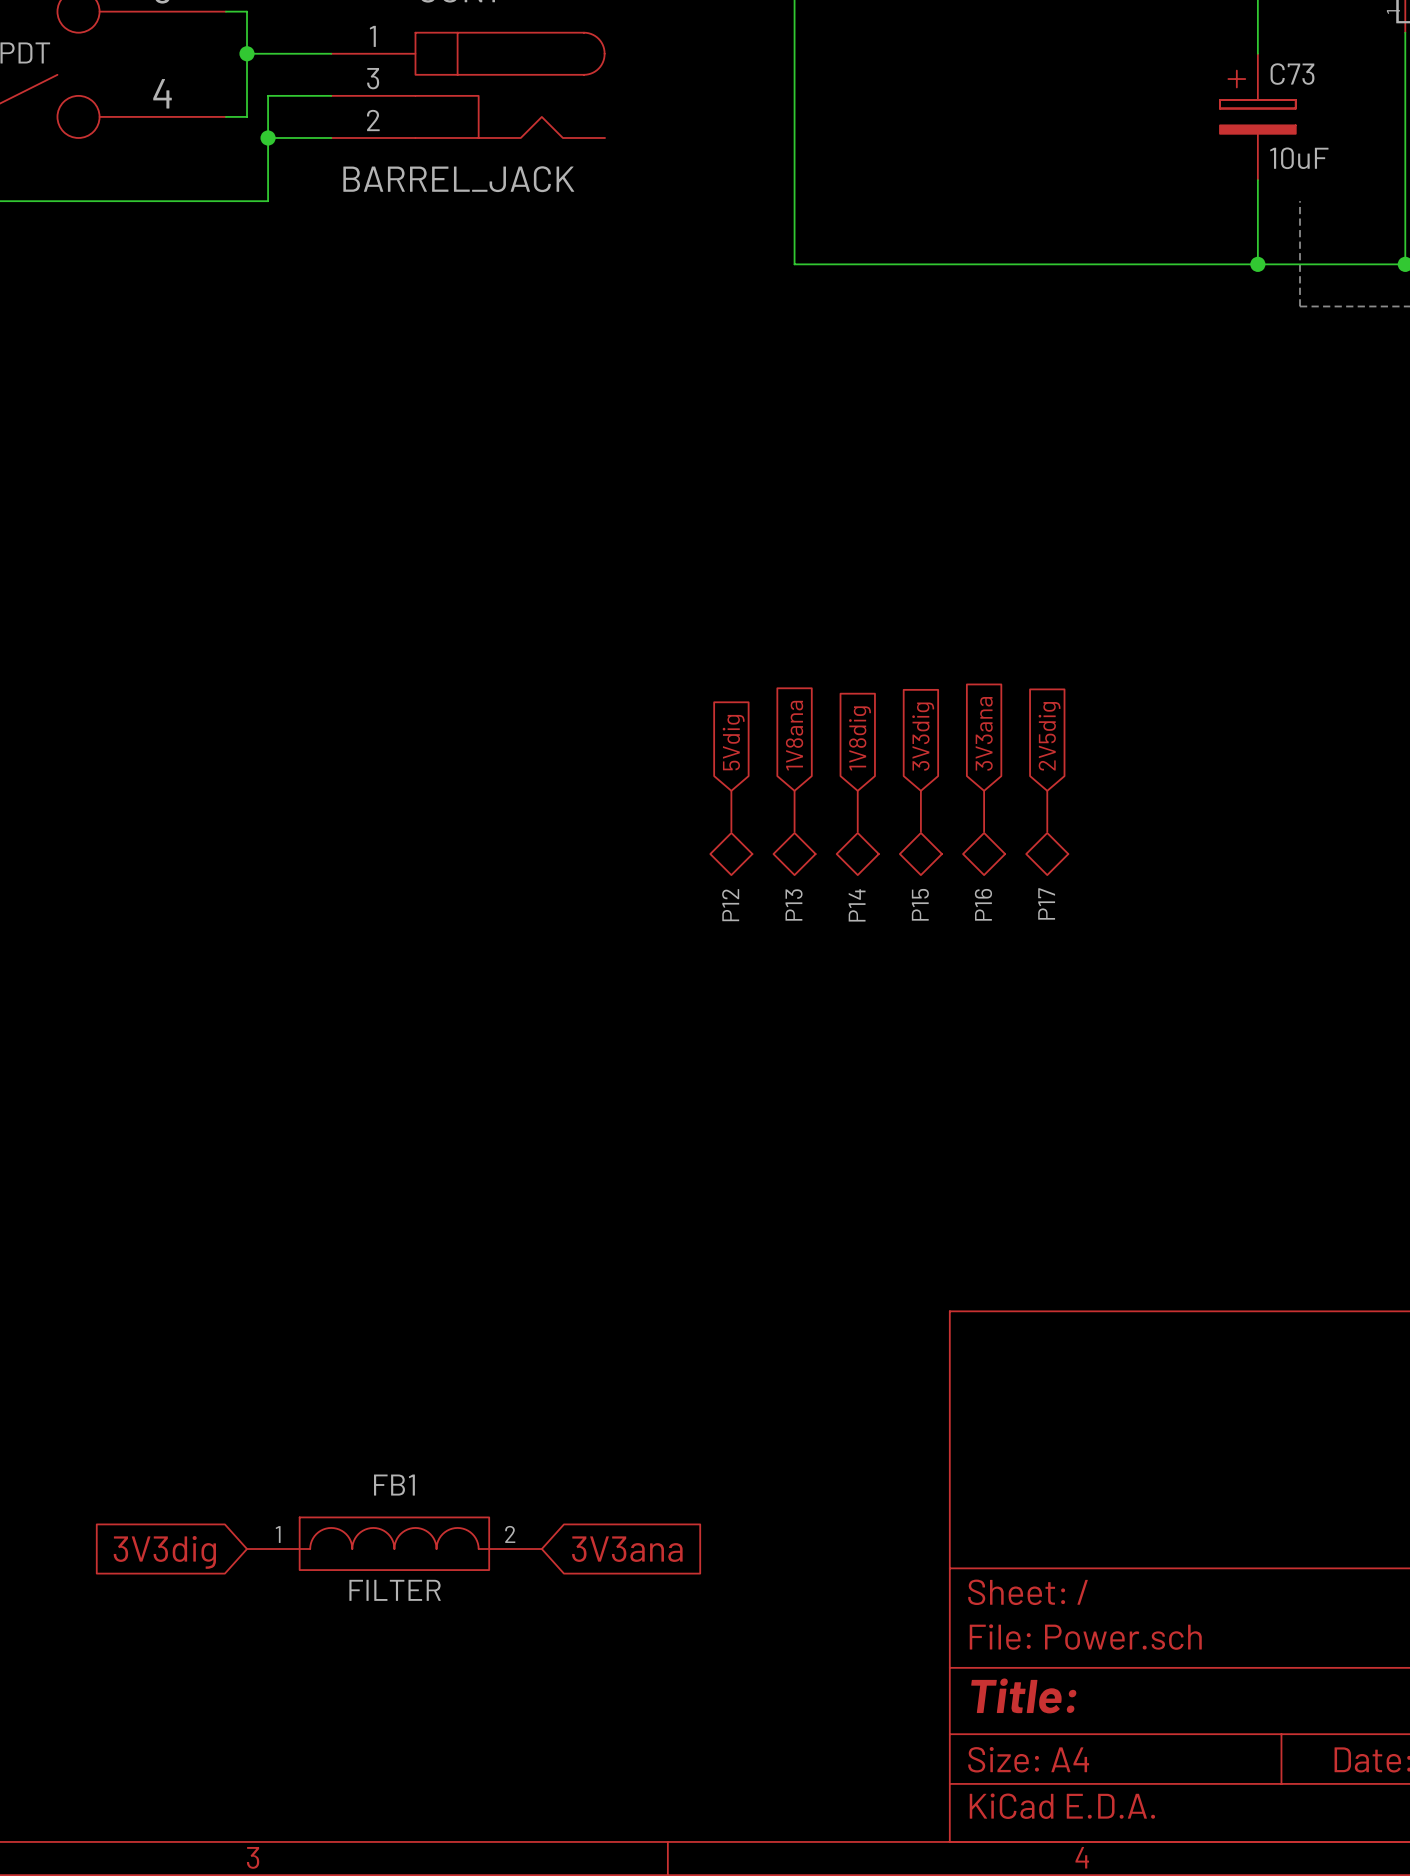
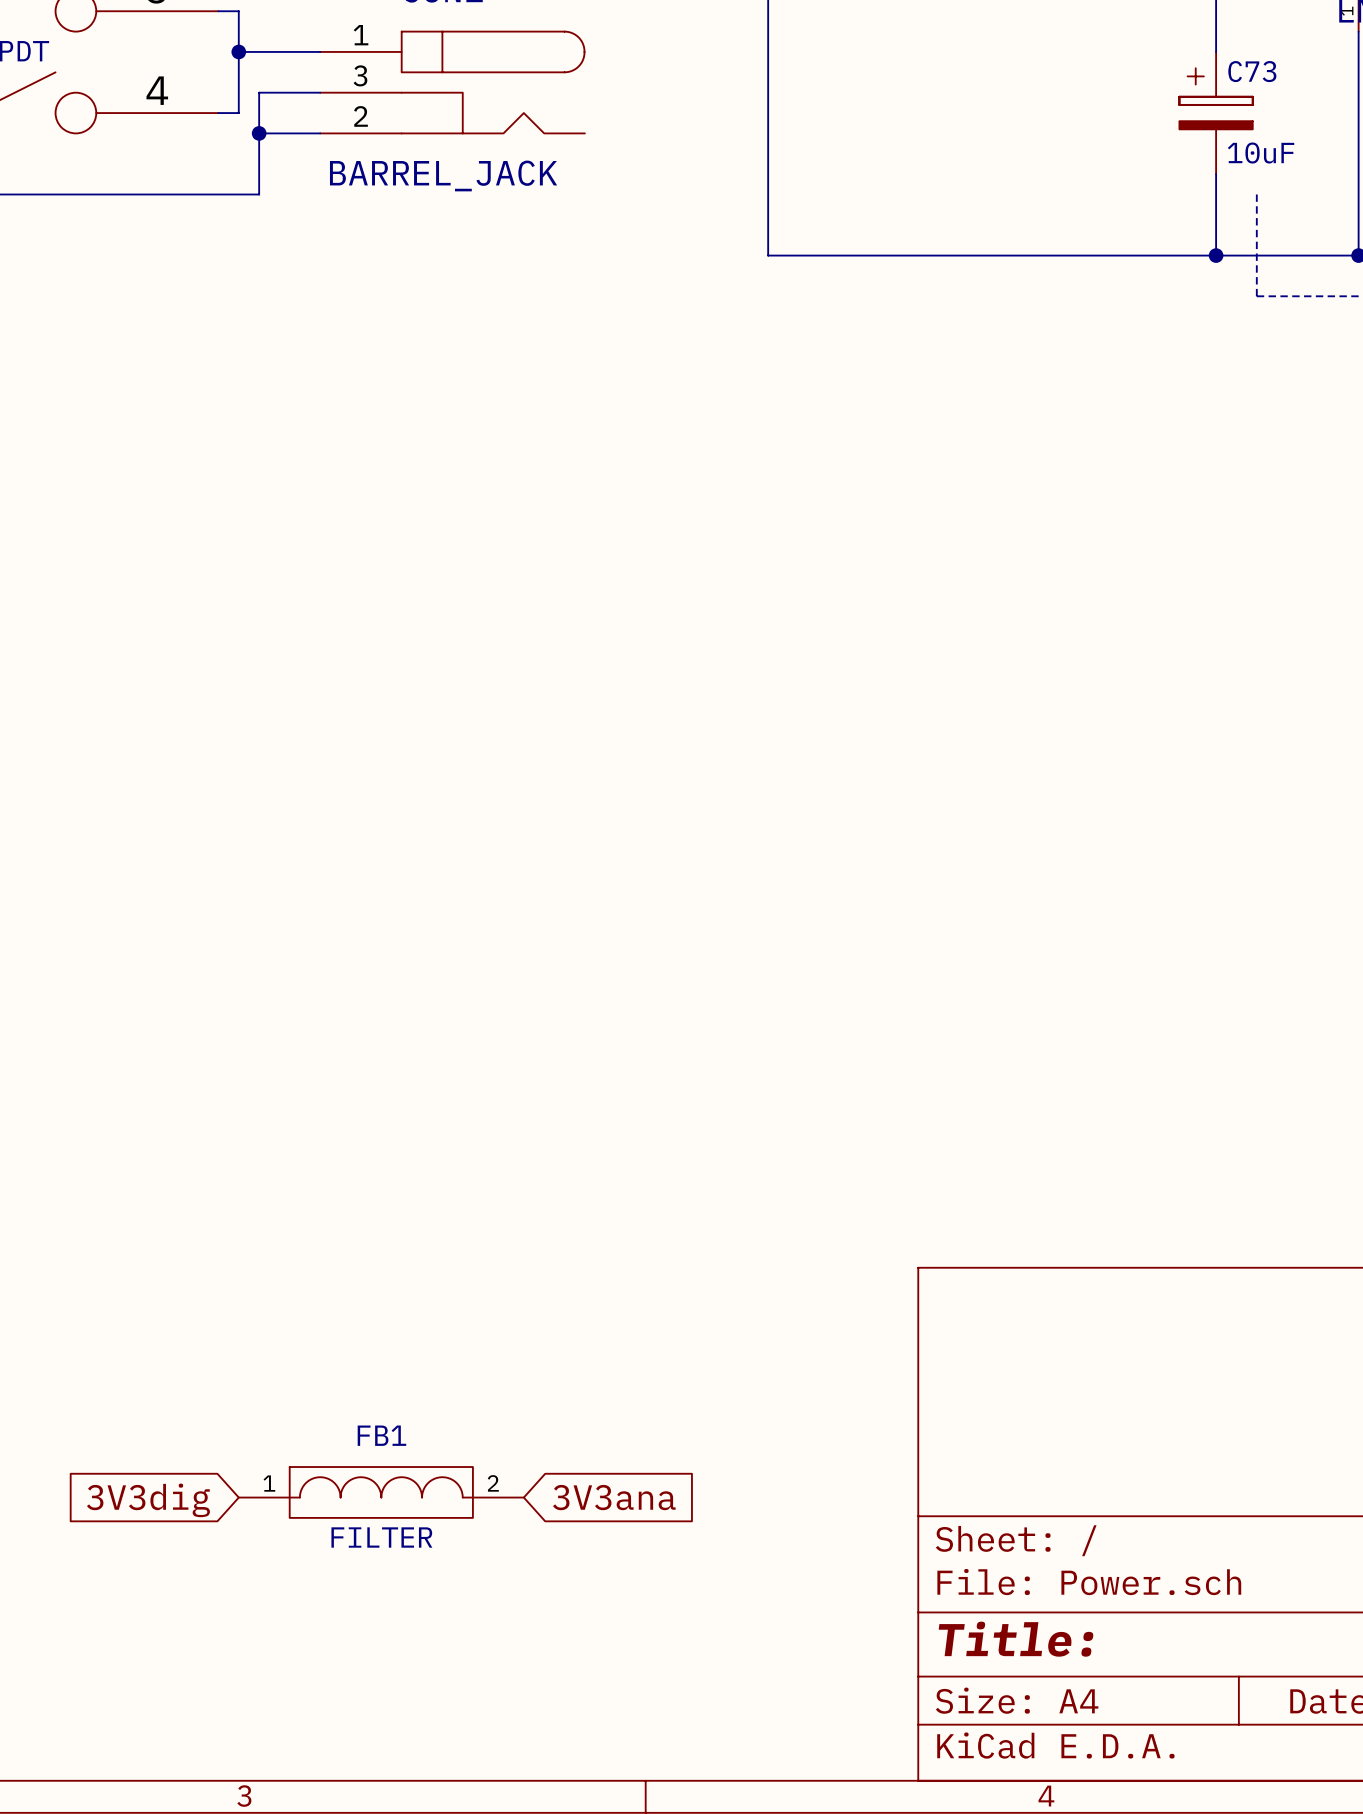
global label: 3V3ana (984, 733) -> none
global label: 1V8ana (794, 735) -> none
global label: 3V3dig (923, 736) -> none
global label: 2V5dig (1049, 736) -> none
global label: 1V8dig (860, 738) -> none
global label: 5Vdig (733, 742) -> none
P12: (731, 832) -> none
P13: (794, 832) -> none
P14: (857, 832) -> none
P15: (920, 832) -> none
P16: (984, 832) -> none
P17: (1047, 832) -> none

